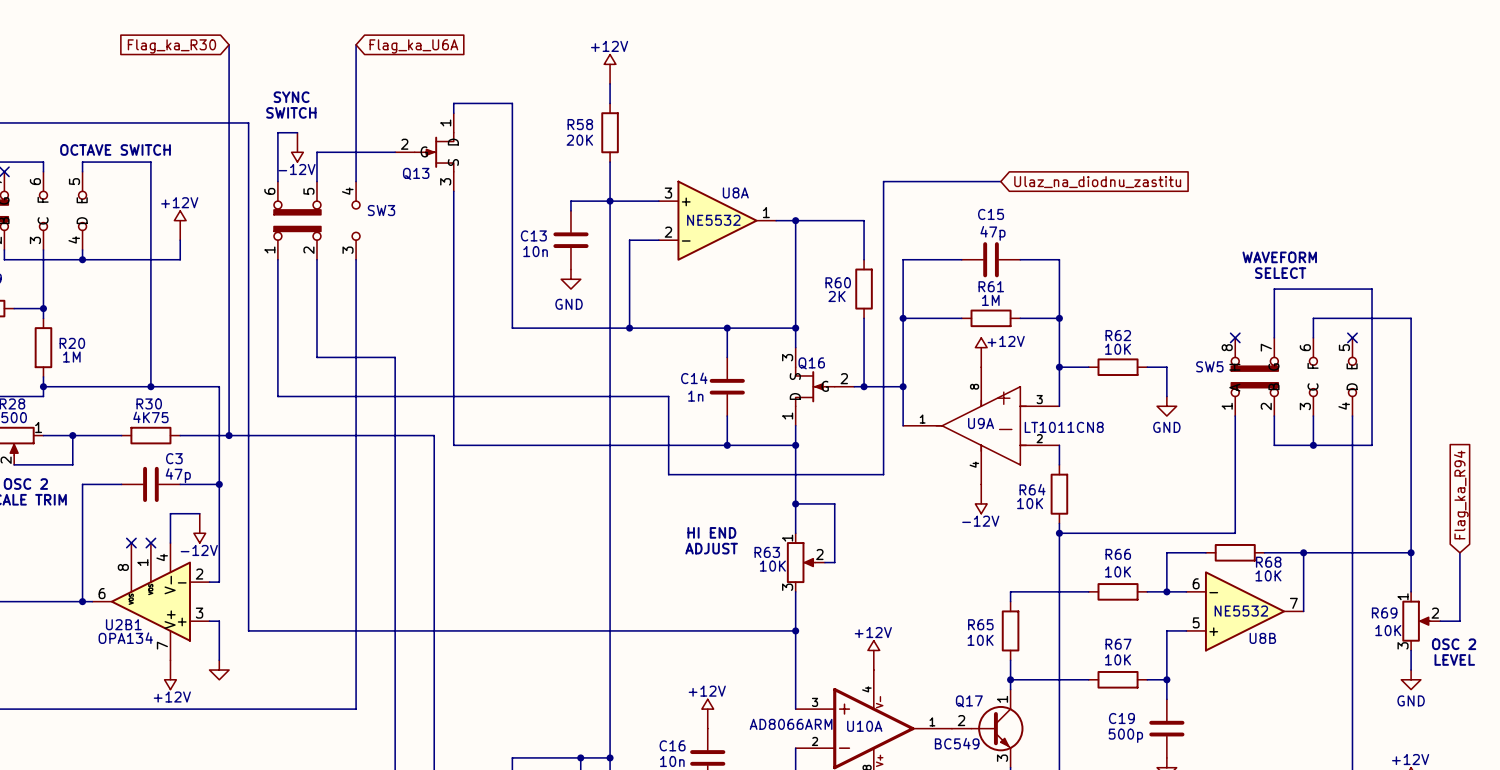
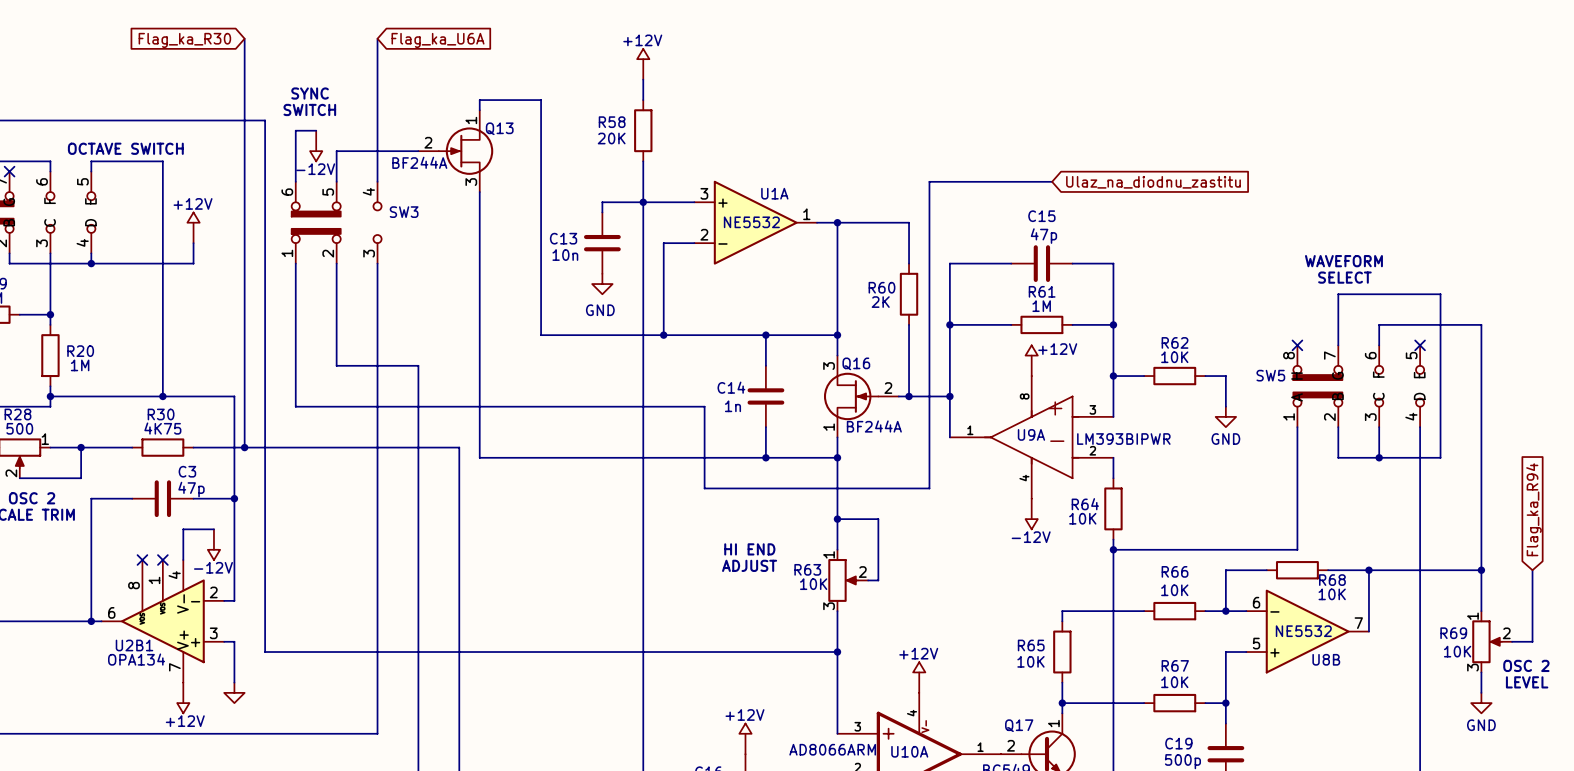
Q13 symbol: [395, 113, 454, 192] -> [418, 110, 494, 193]
Q13 value: none -> BF244A (419, 162)
Q13 name position: Q13 (416, 173) -> Q13 (499, 128)
U8A name: U8A (735, 192) -> U1A (774, 193)
Q16 symbol: [795, 347, 855, 426] -> [823, 355, 899, 438]
Q16 value: none -> BF244A (874, 426)
U9A value: LT1011CN8 (1064, 427) -> LM393BIPWR (1123, 439)

